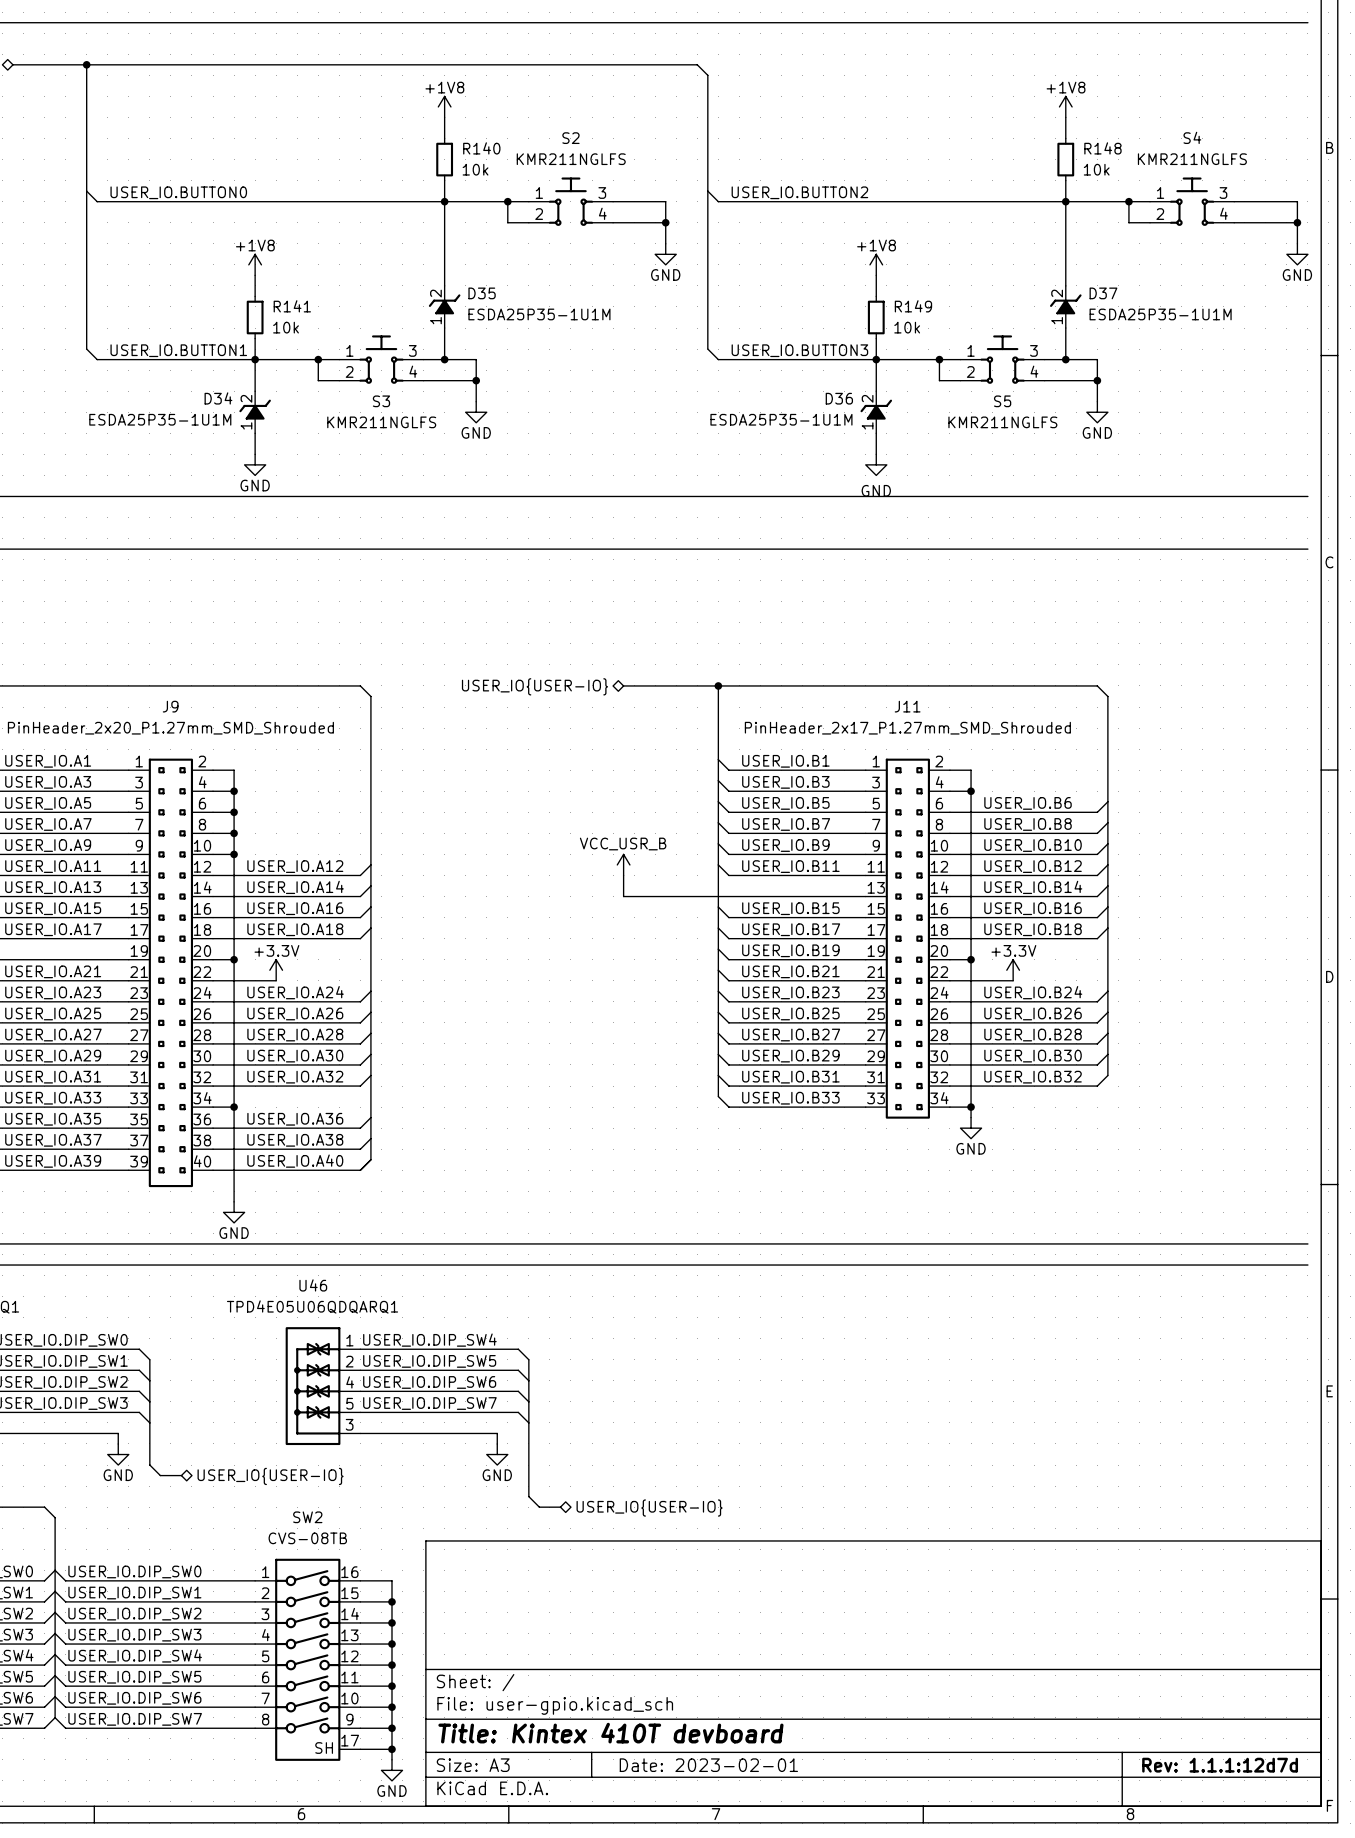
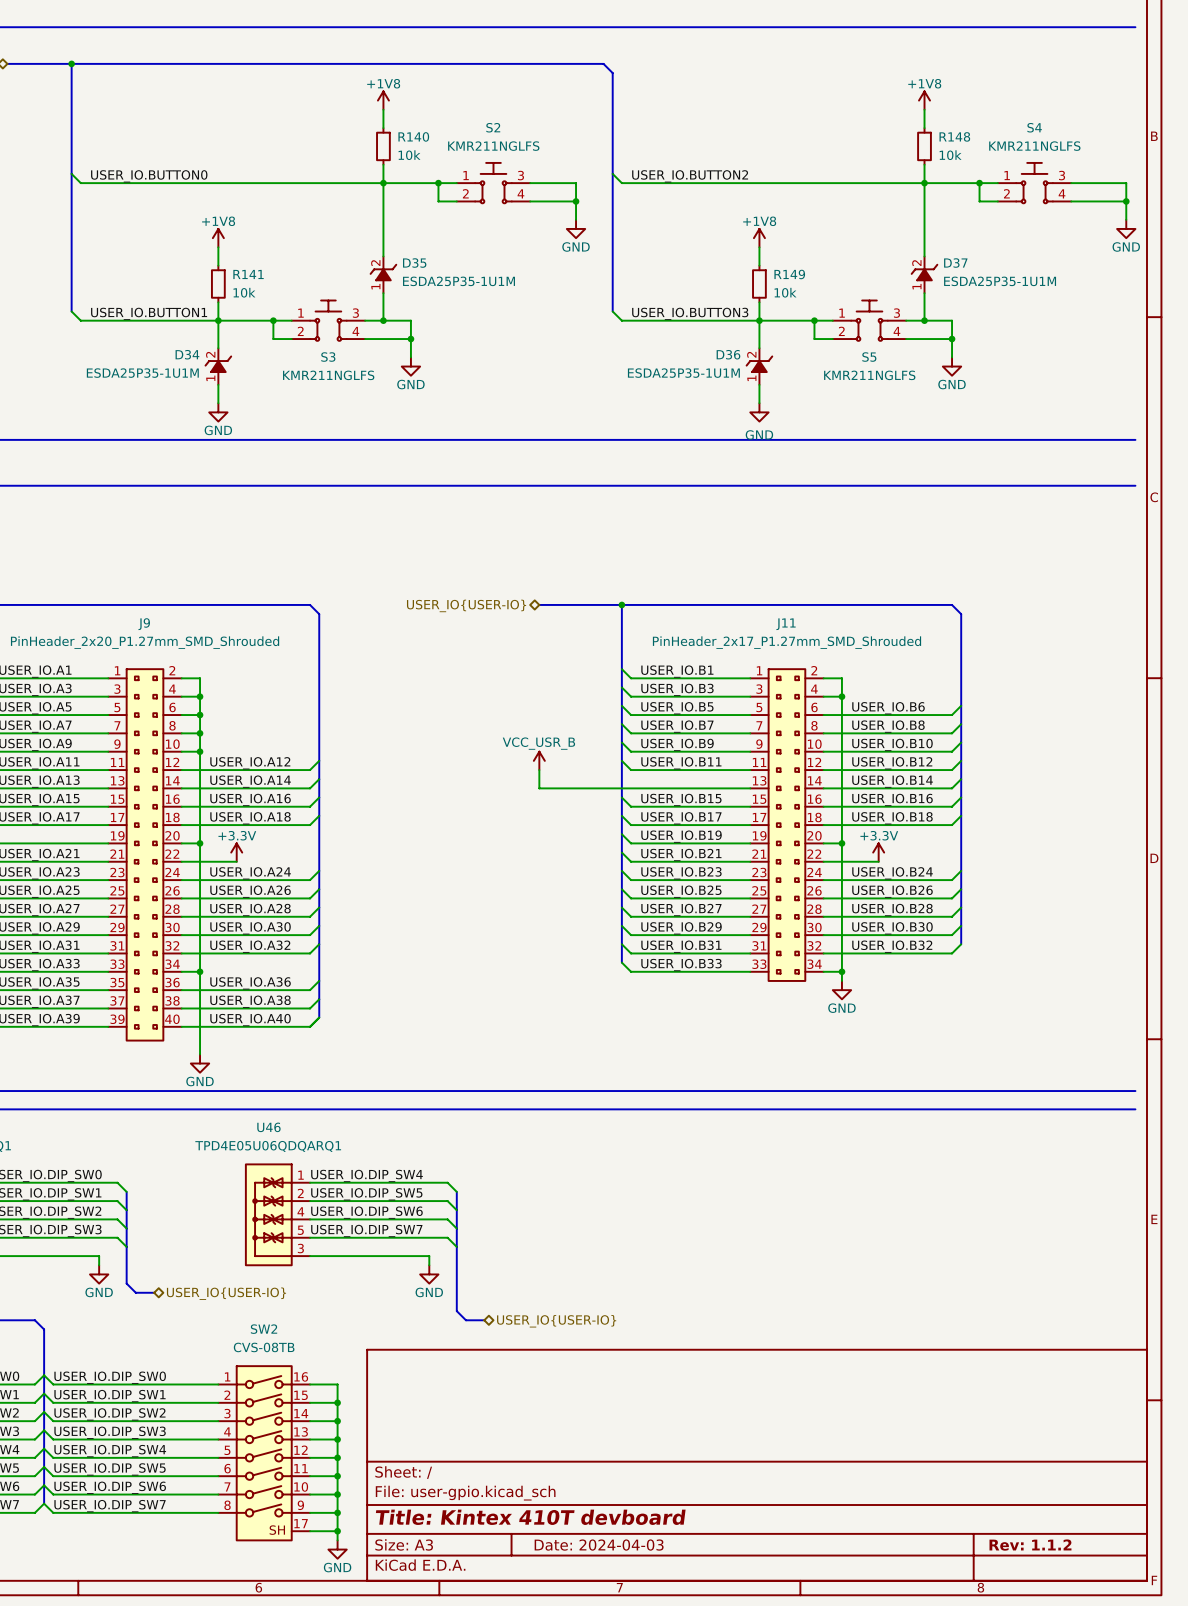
title block: Date: 2023-02-01 (708, 1765) -> Date: 2024-04-03 (599, 1545)
title block: Rev: 1.1.1:12d7d (1220, 1765) -> Rev: 1.1.2 (1030, 1545)

